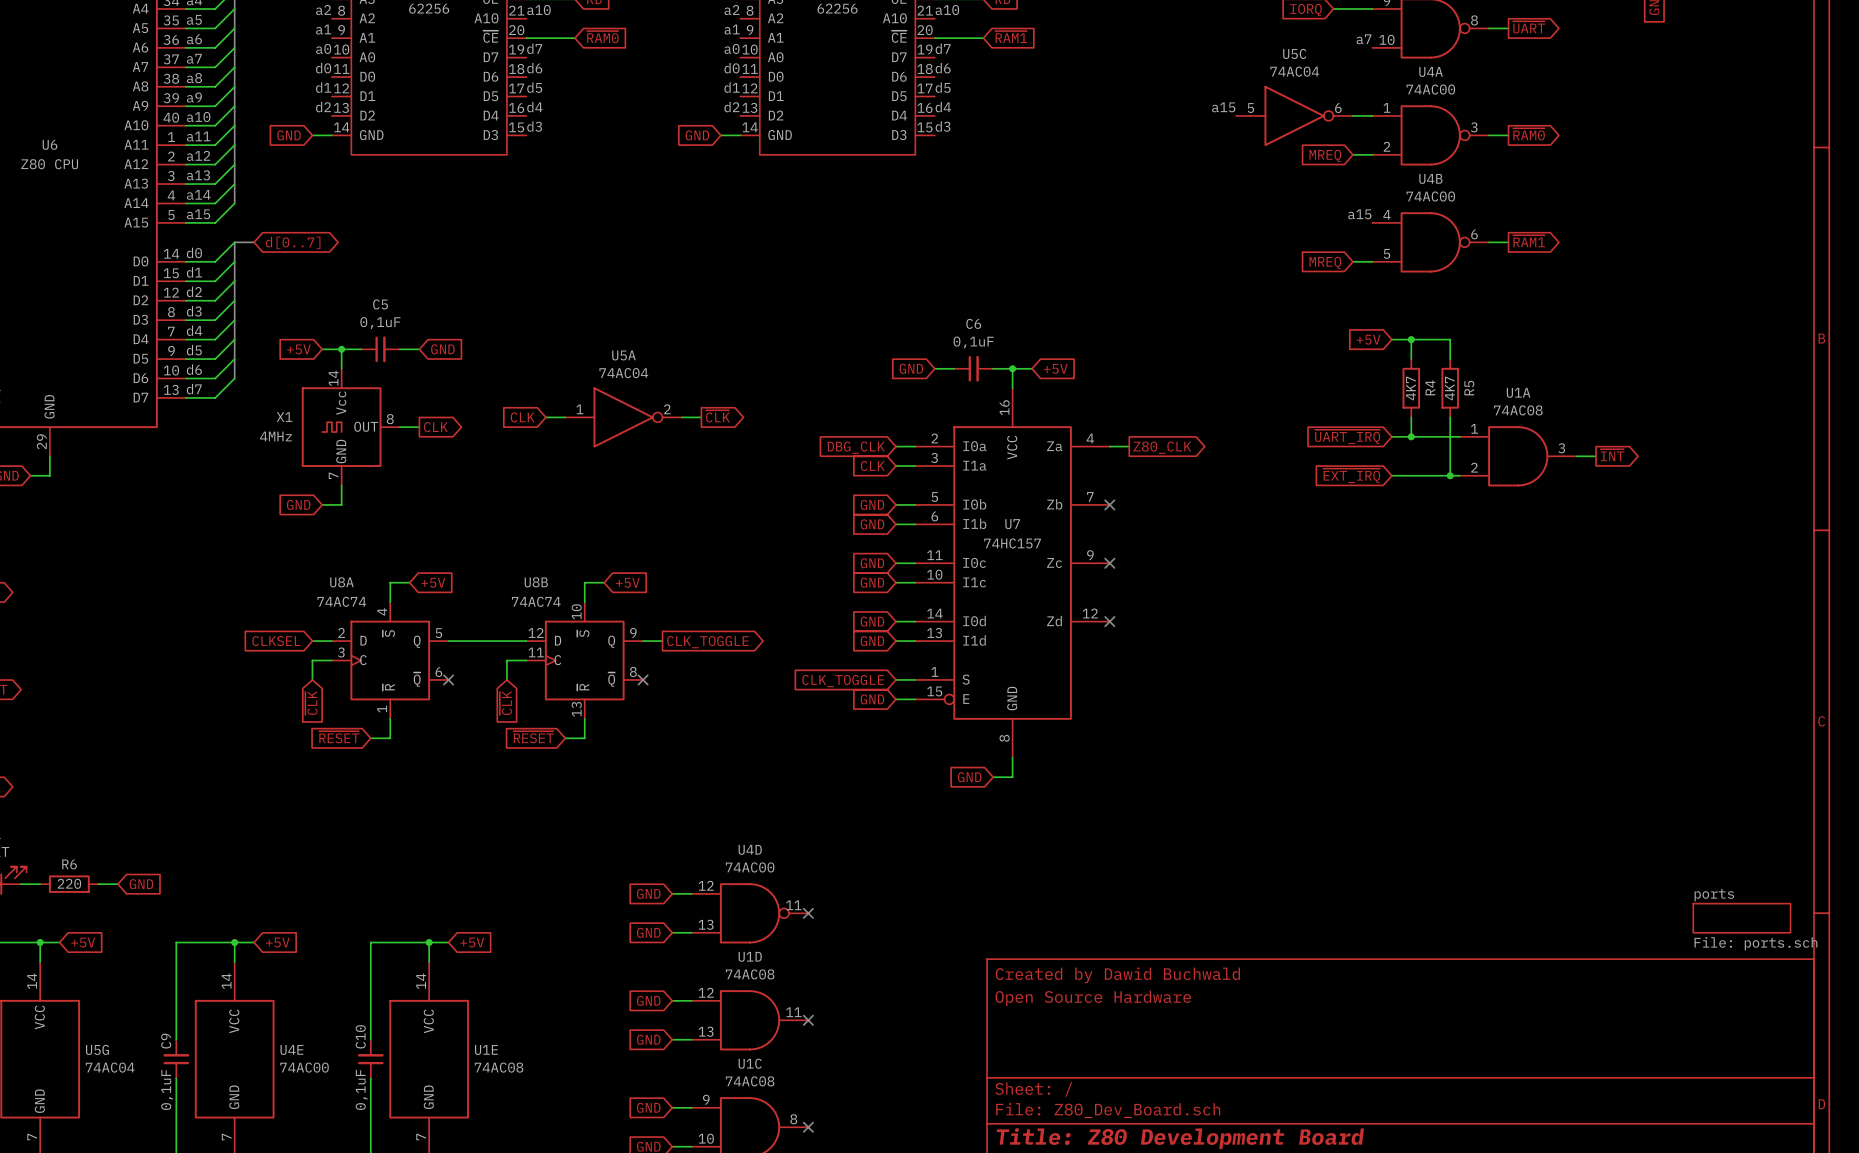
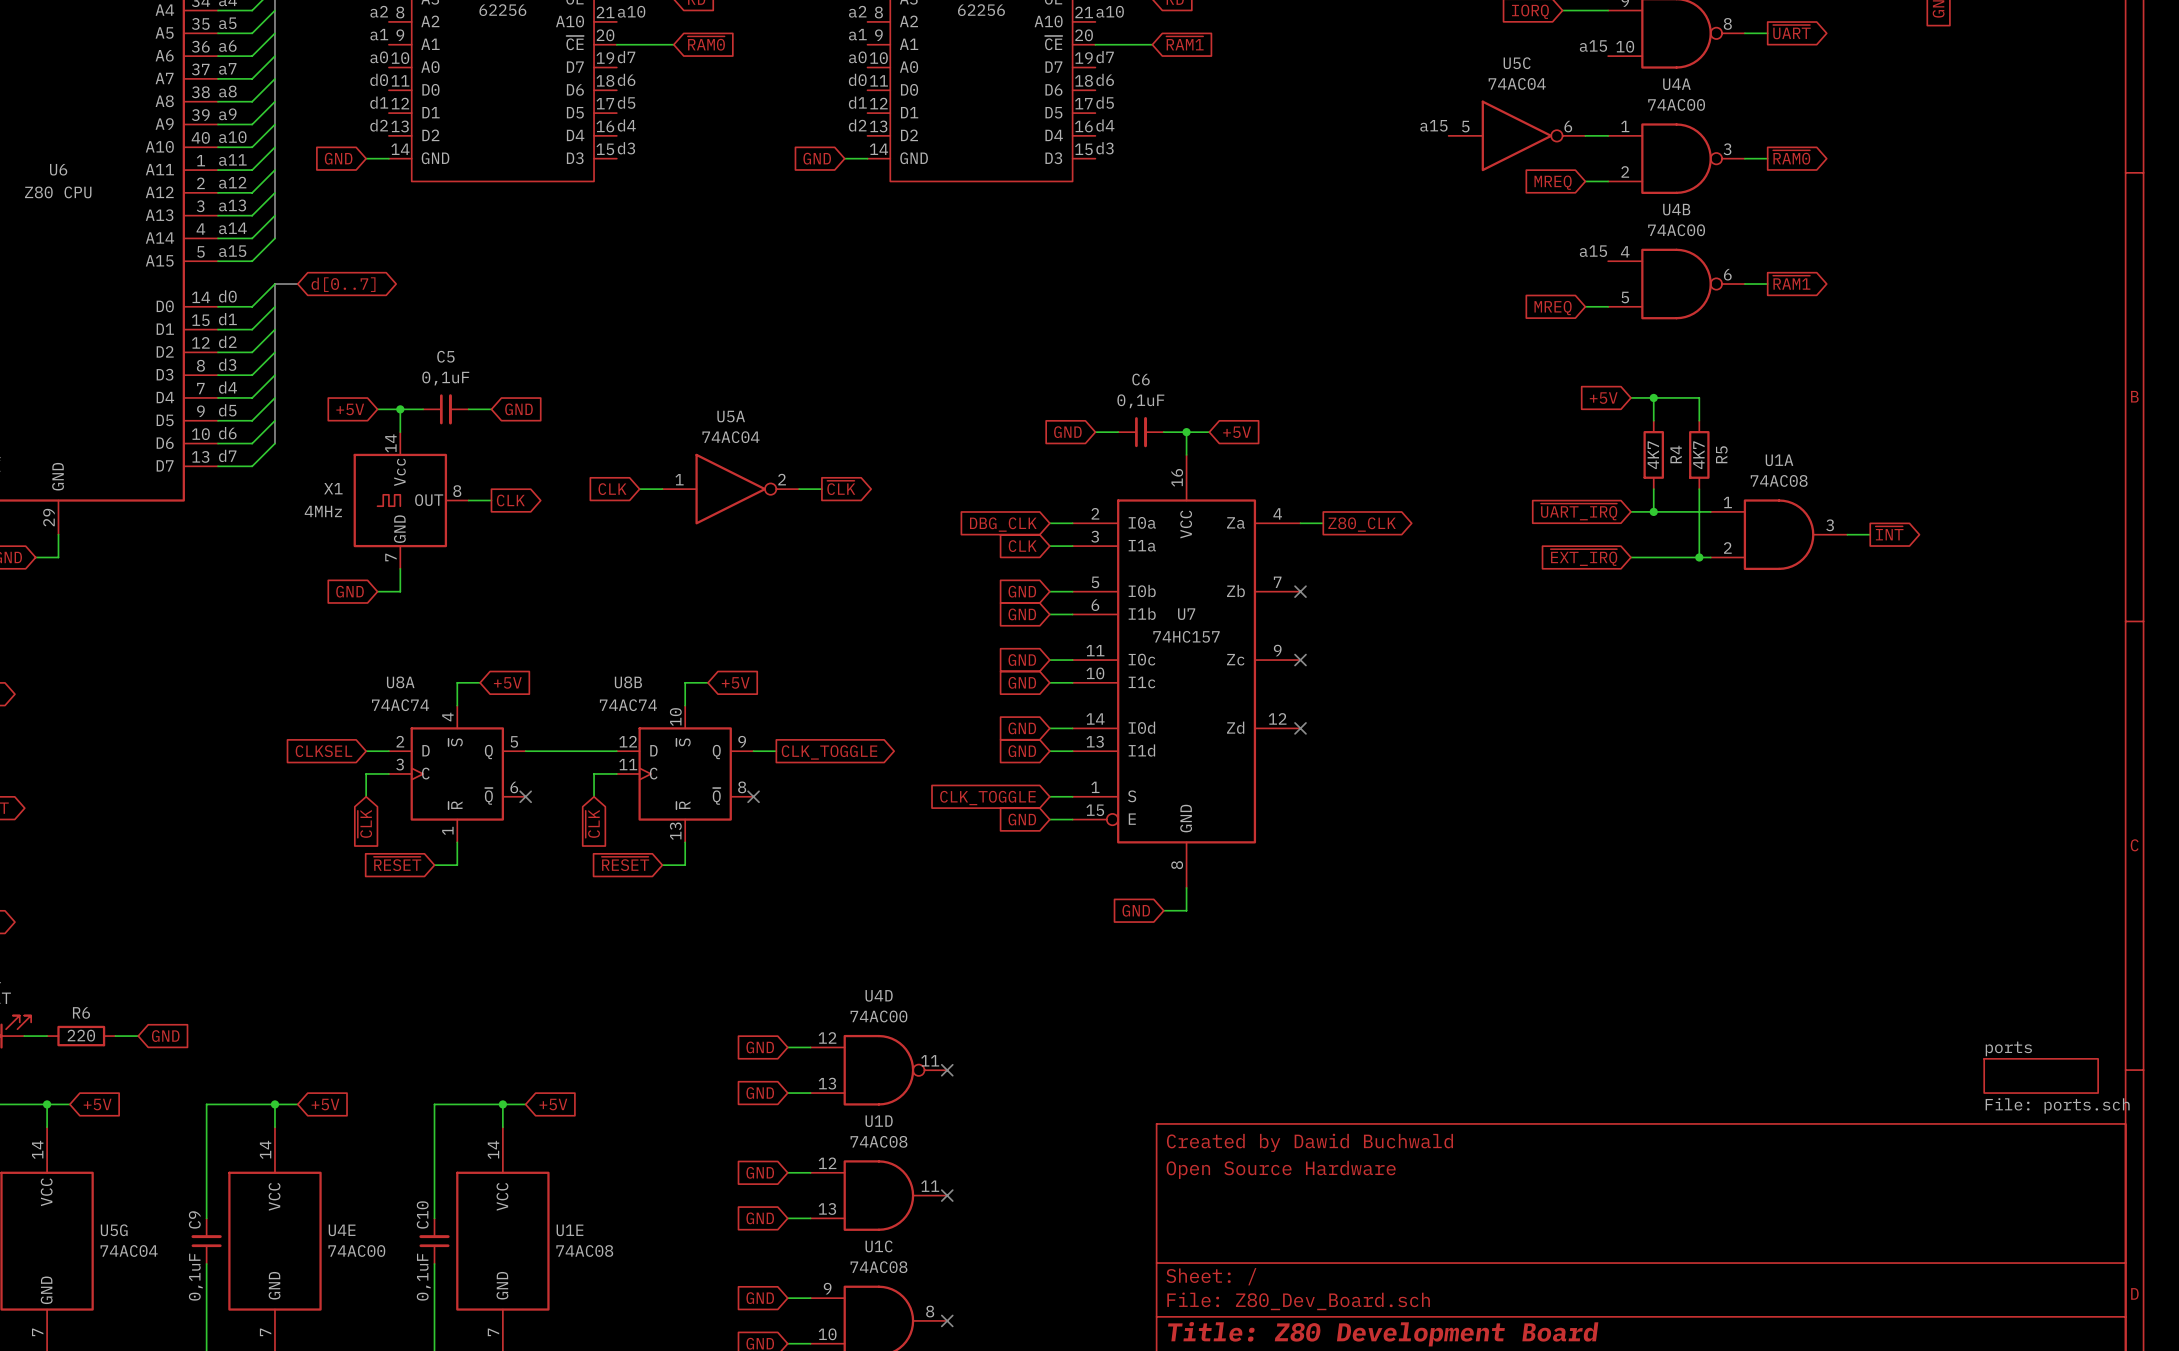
label: a7 (1364, 39) -> a15 (1593, 46)

